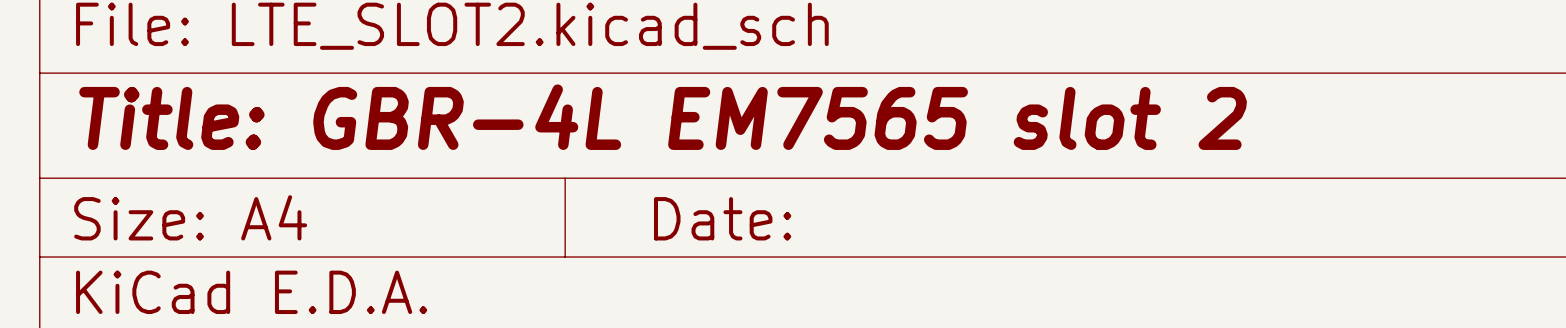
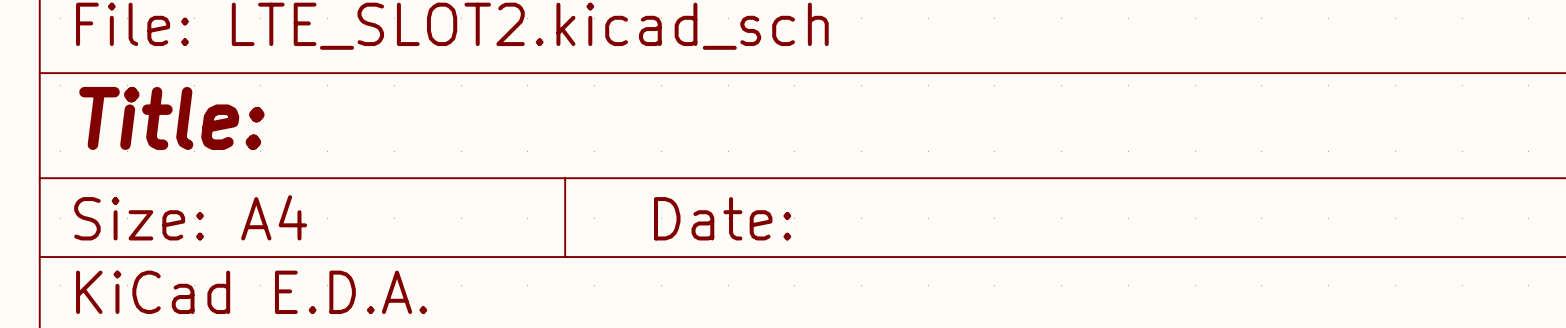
title block: Title: GBR-4L EM7565 slot 2 (663, 117) -> Title: (171, 118)

